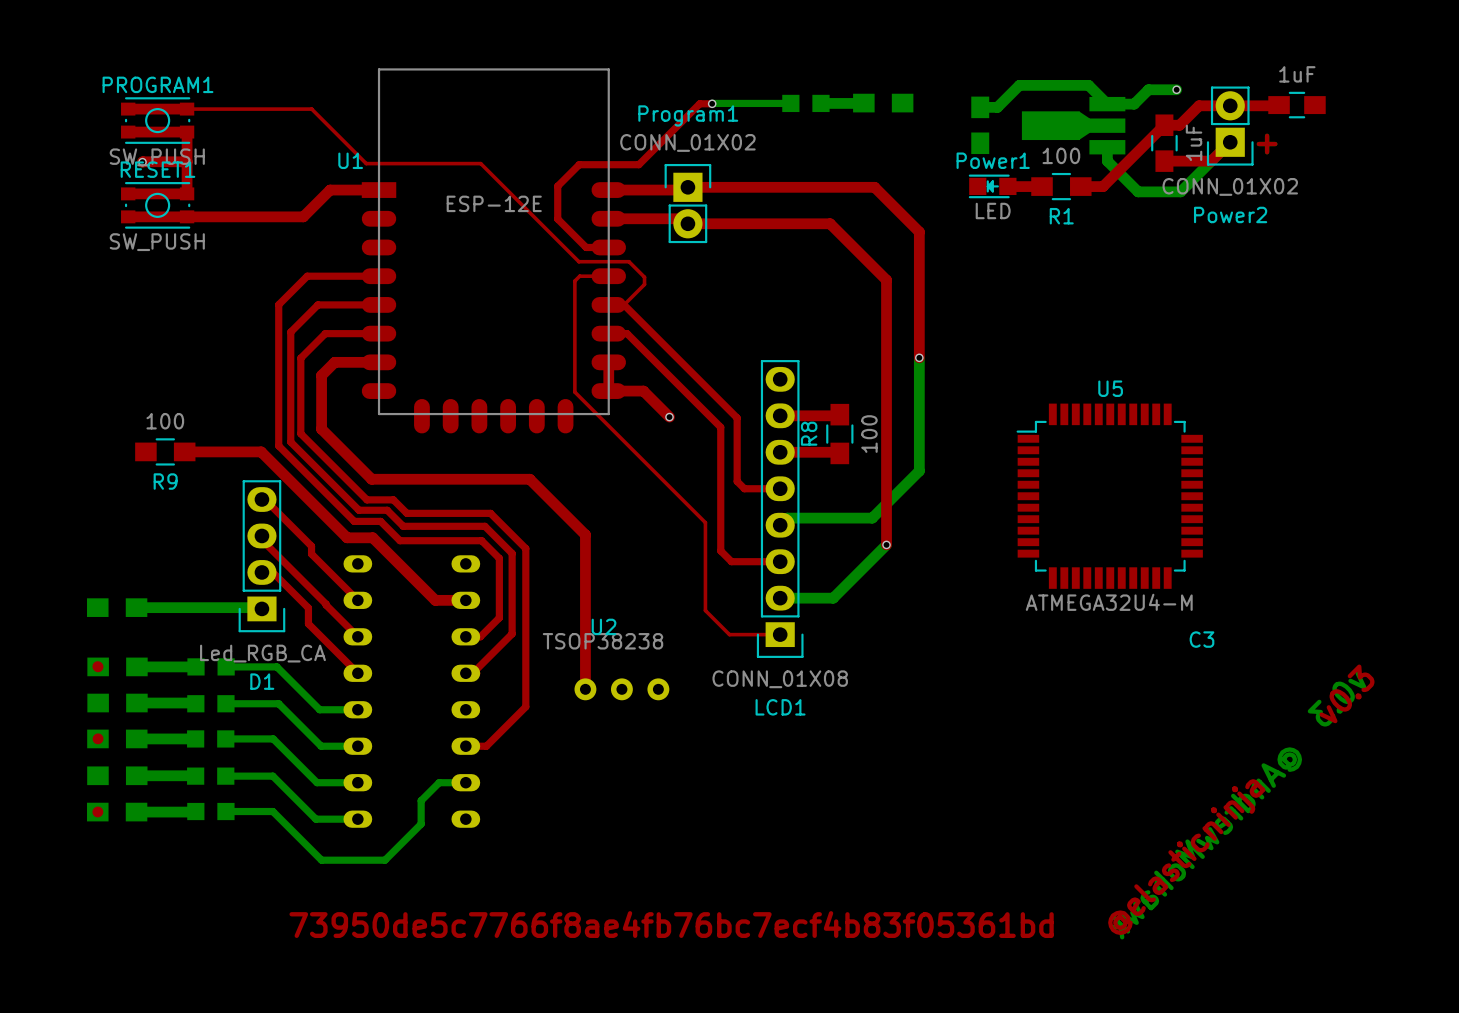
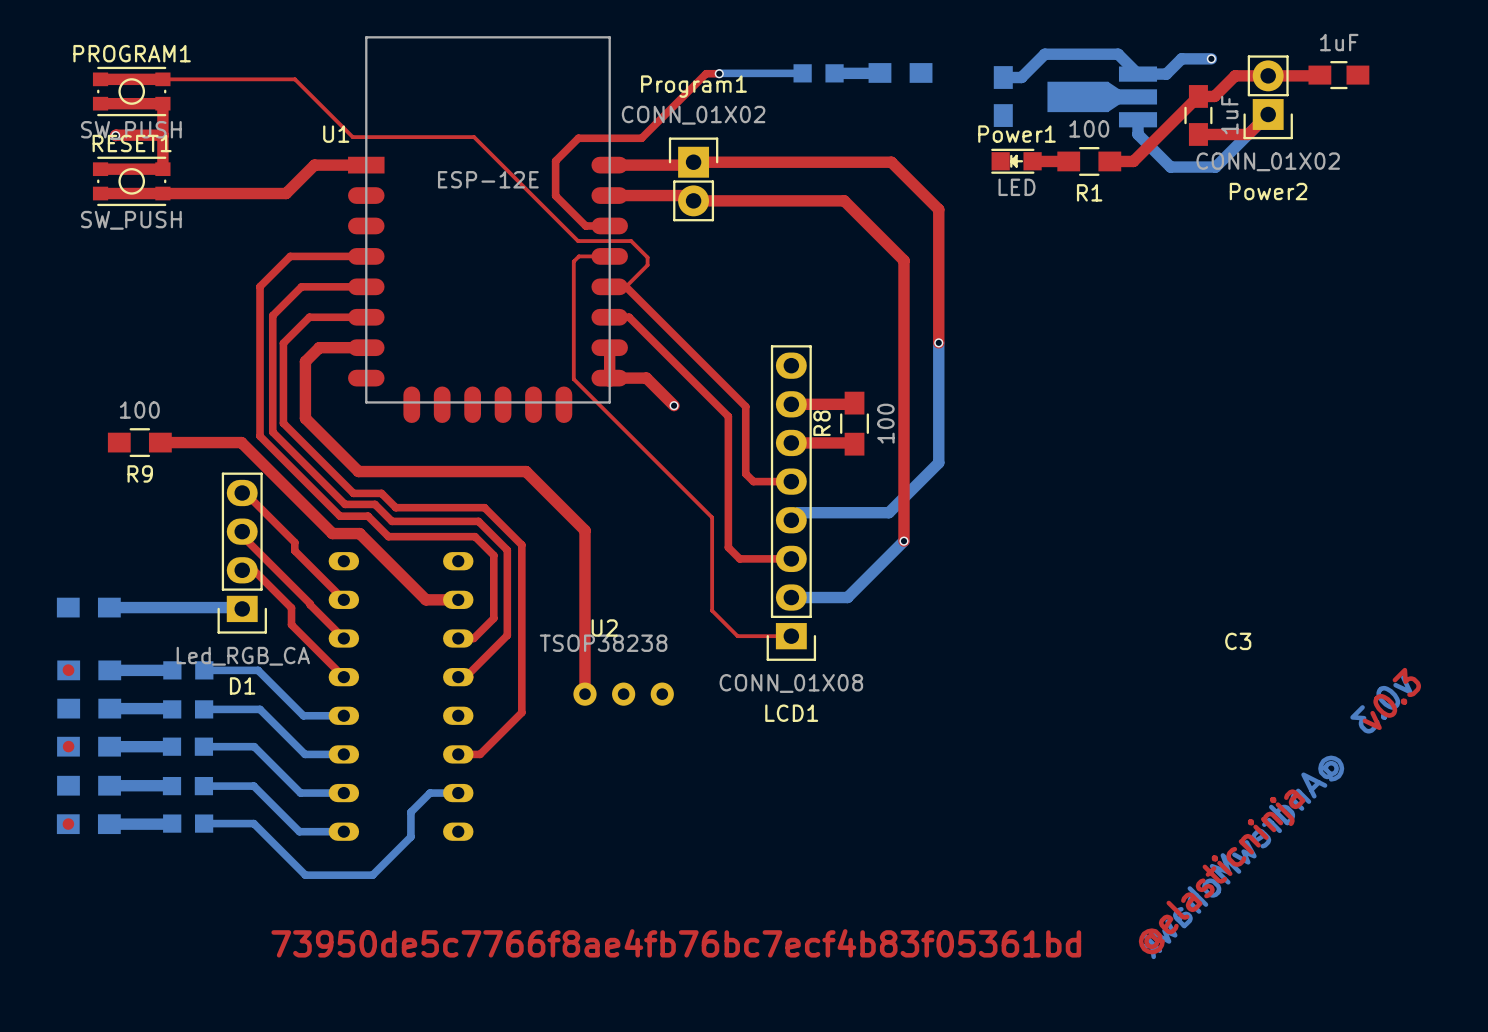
text: + (1267, 144) -> none
U5: ATMEGA32U4-M (1109, 496) -> none

